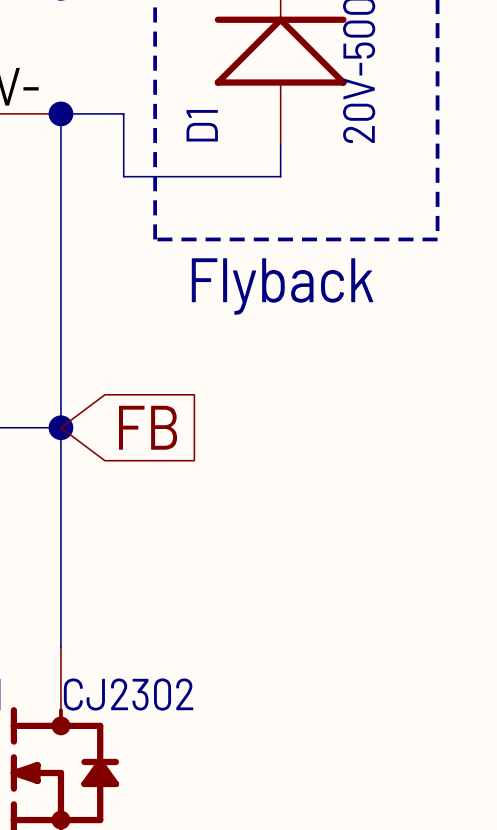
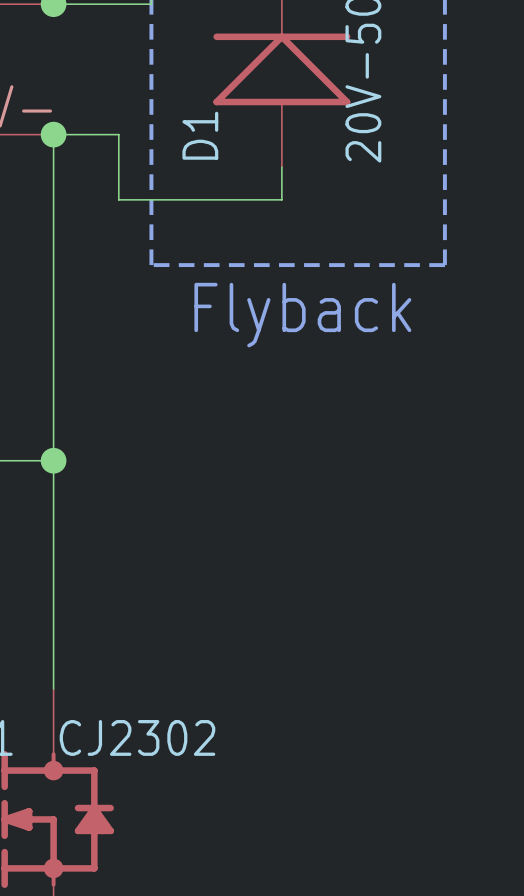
global label: FB (148, 427) -> none

